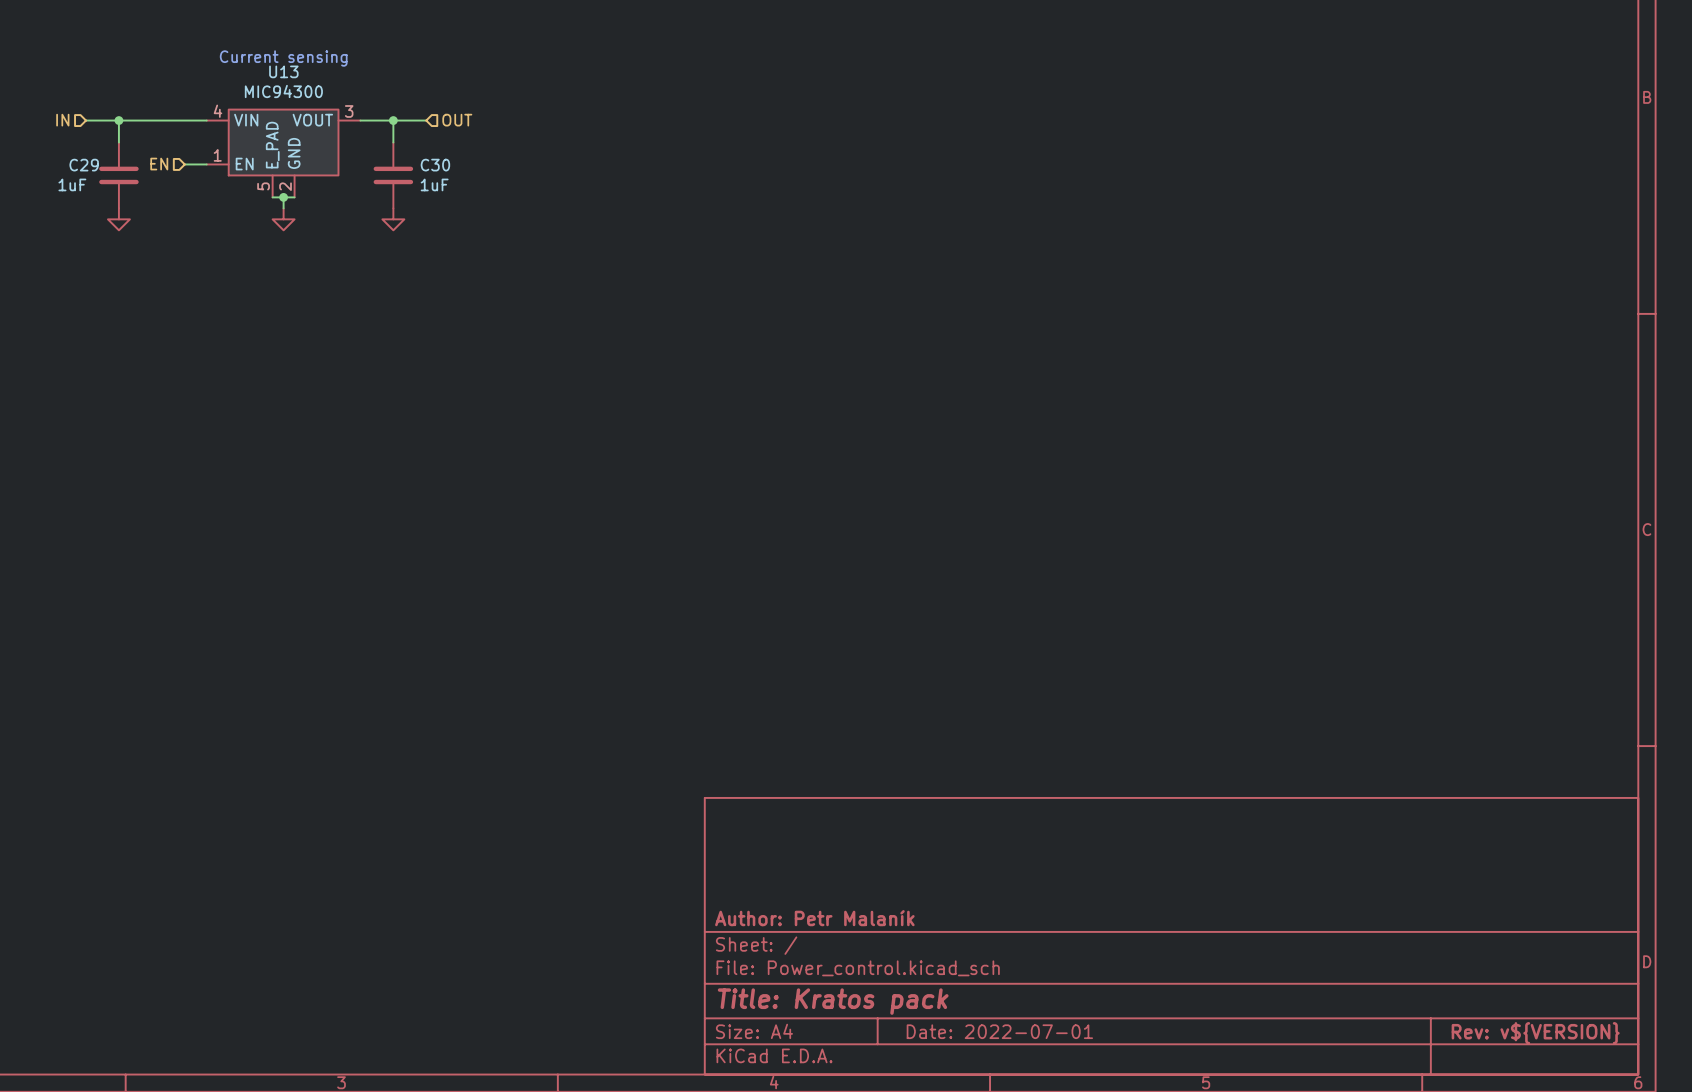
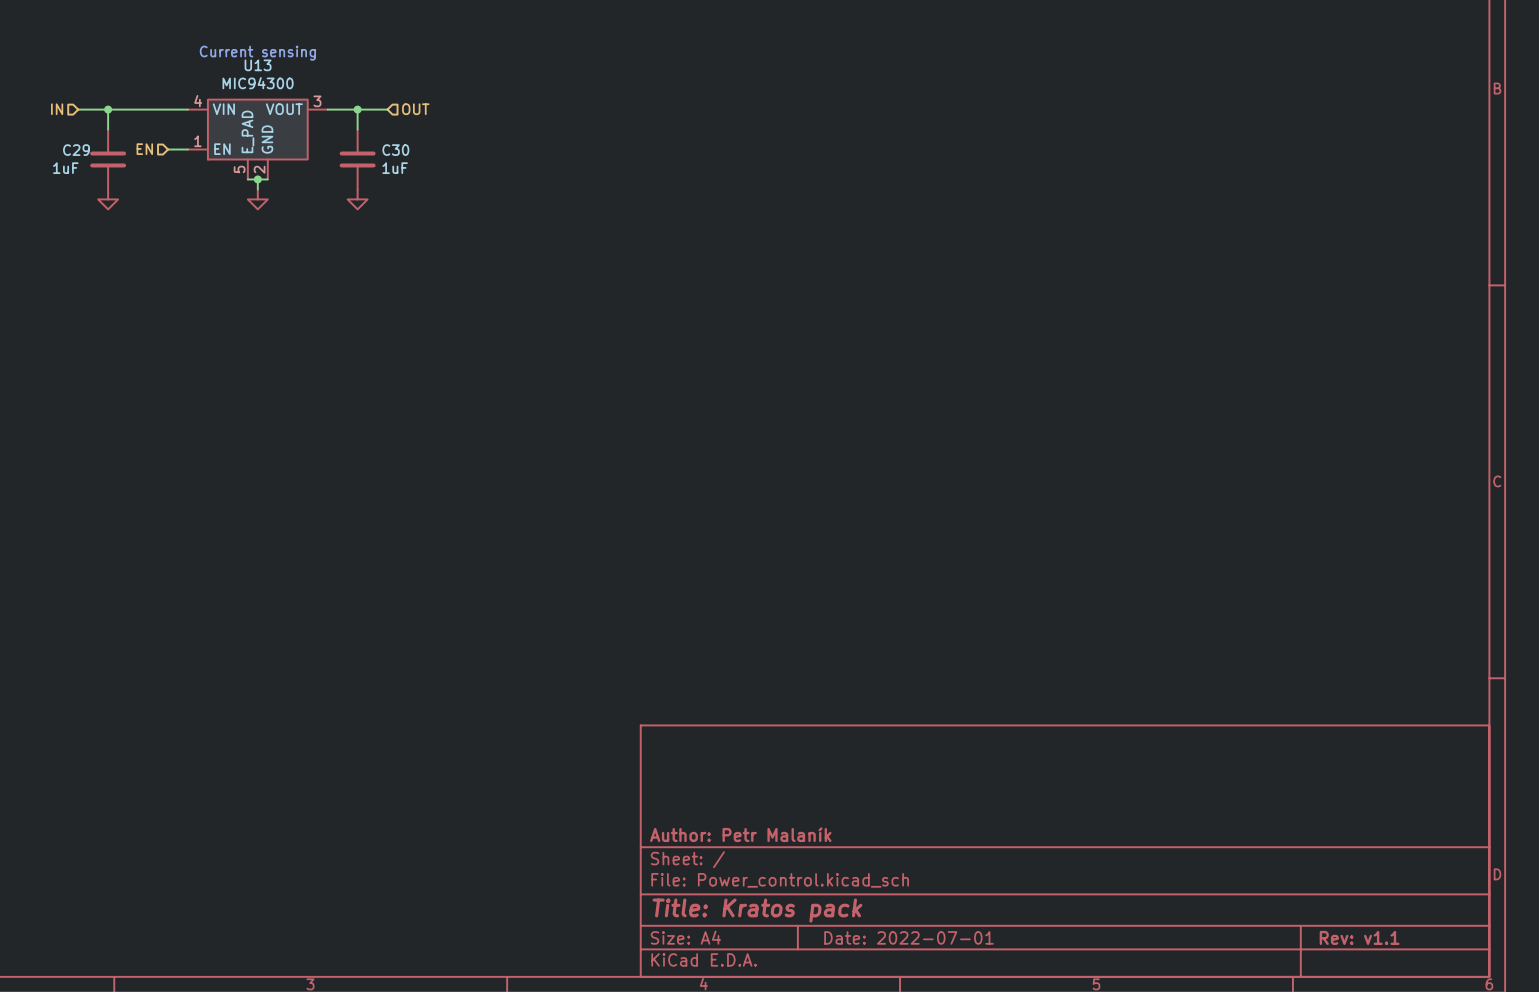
title block: Rev: v${VERSION} (1535, 1033) -> Rev: v1.1 (1359, 937)

